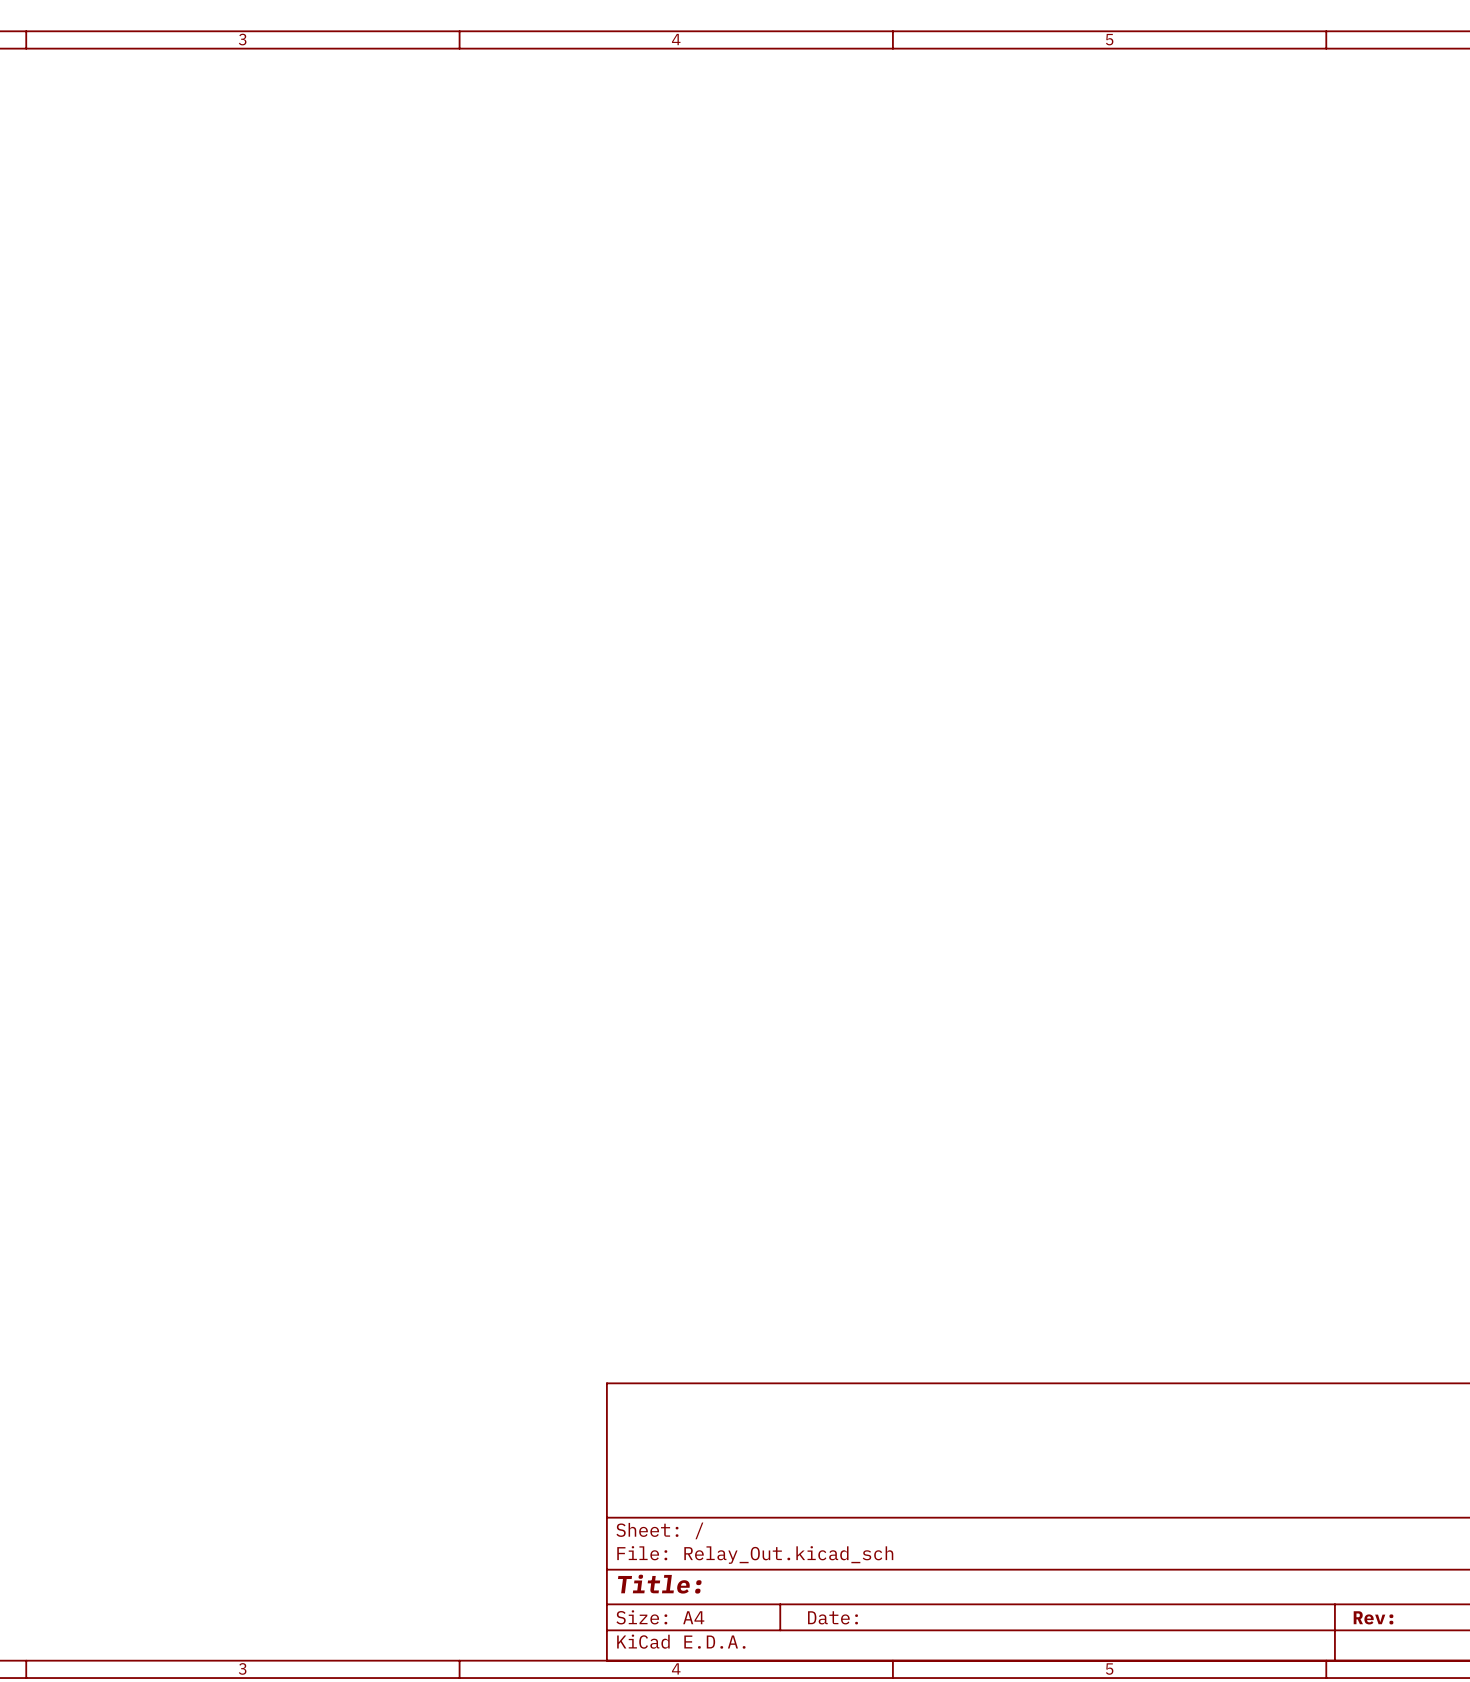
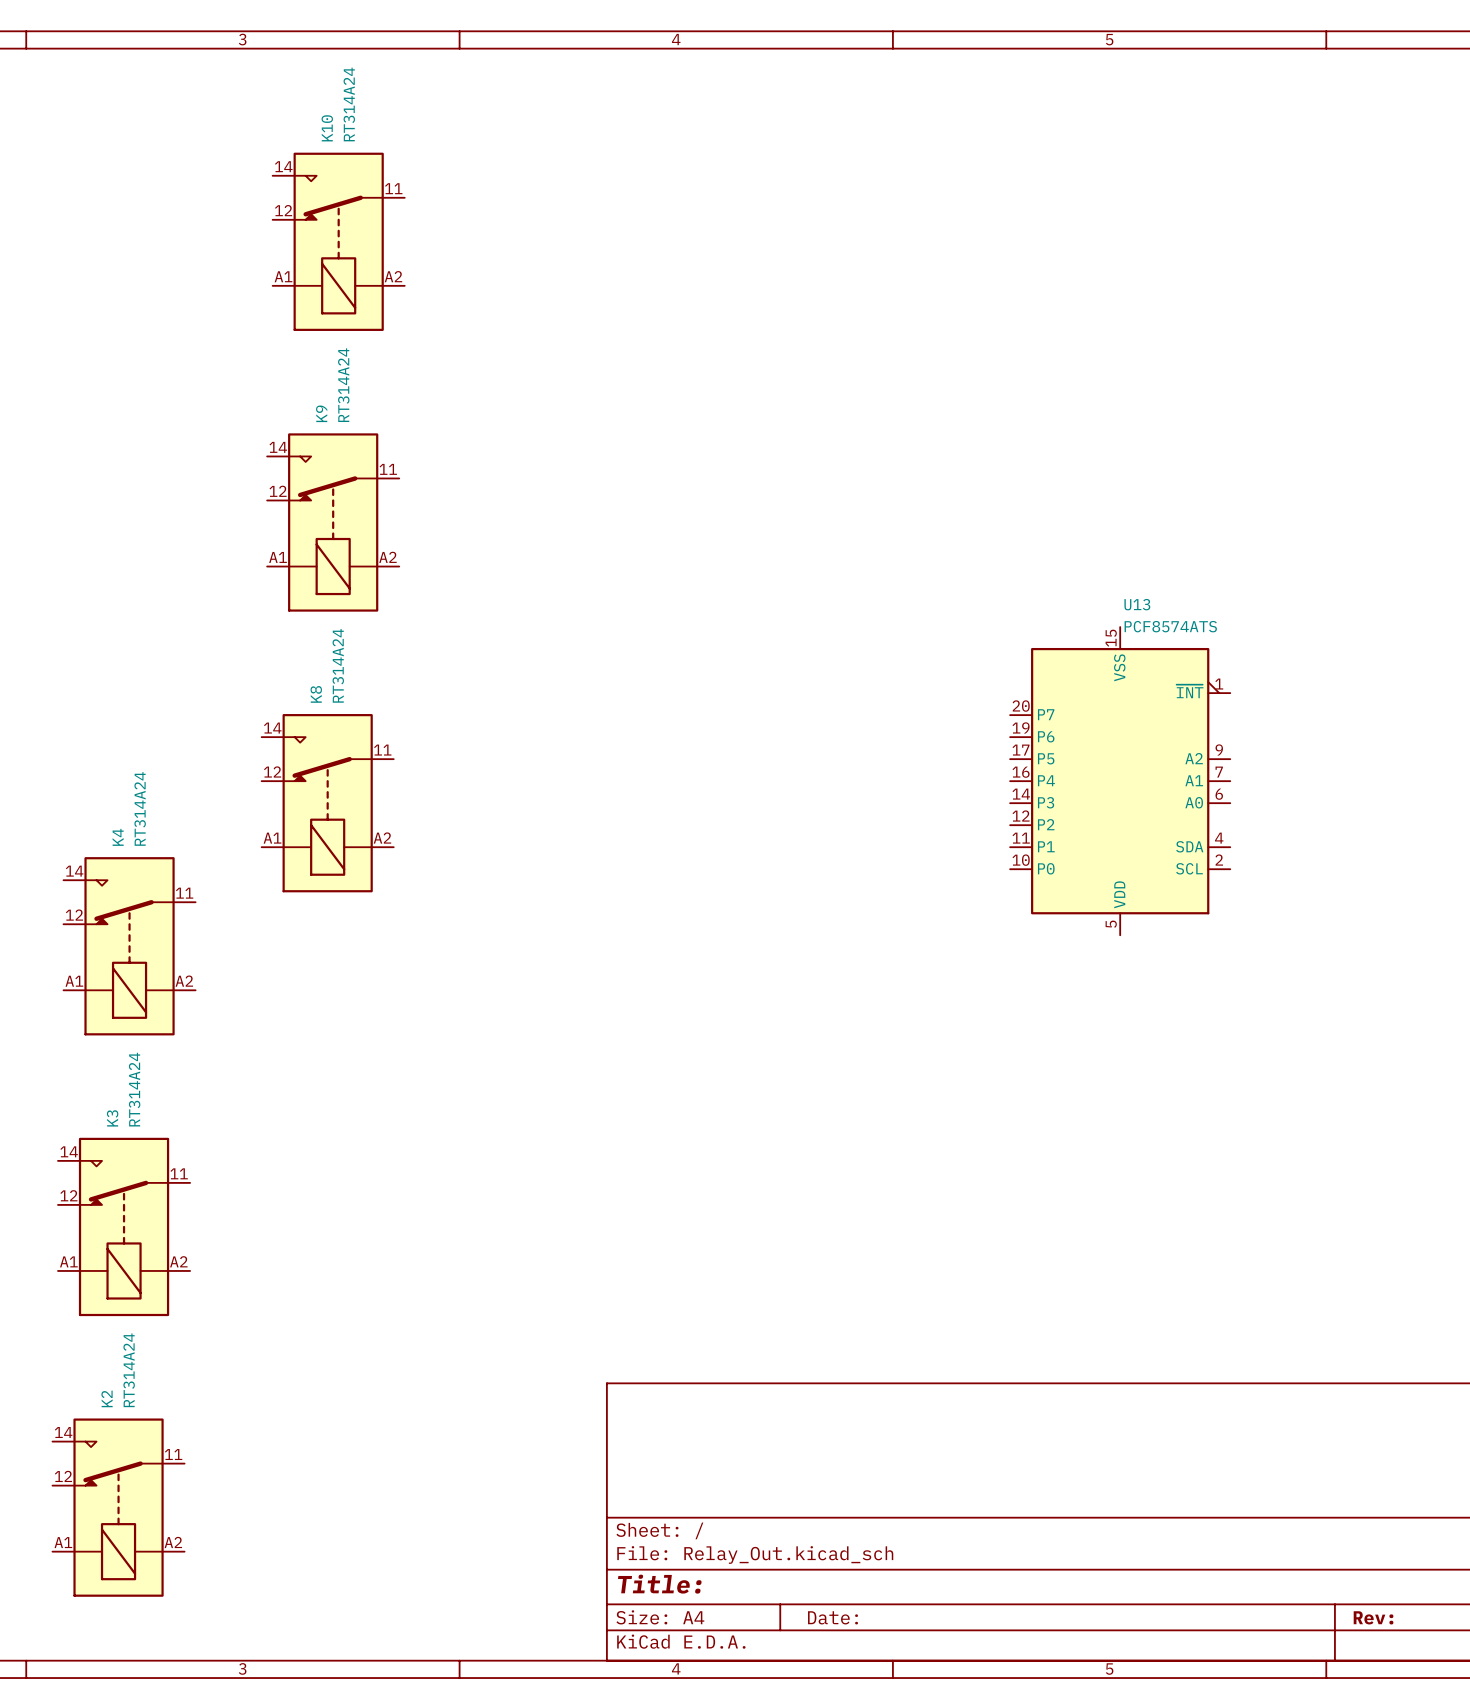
K10: none -> RT314A24 (338, 241)
K9: none -> RT314A24 (333, 522)
U13: none -> PCF8574ATS (1120, 781)
K8: none -> RT314A24 (327, 803)
K4: none -> RT314A24 (129, 946)
K3: none -> RT314A24 (124, 1226)
K2: none -> RT314A24 (118, 1507)

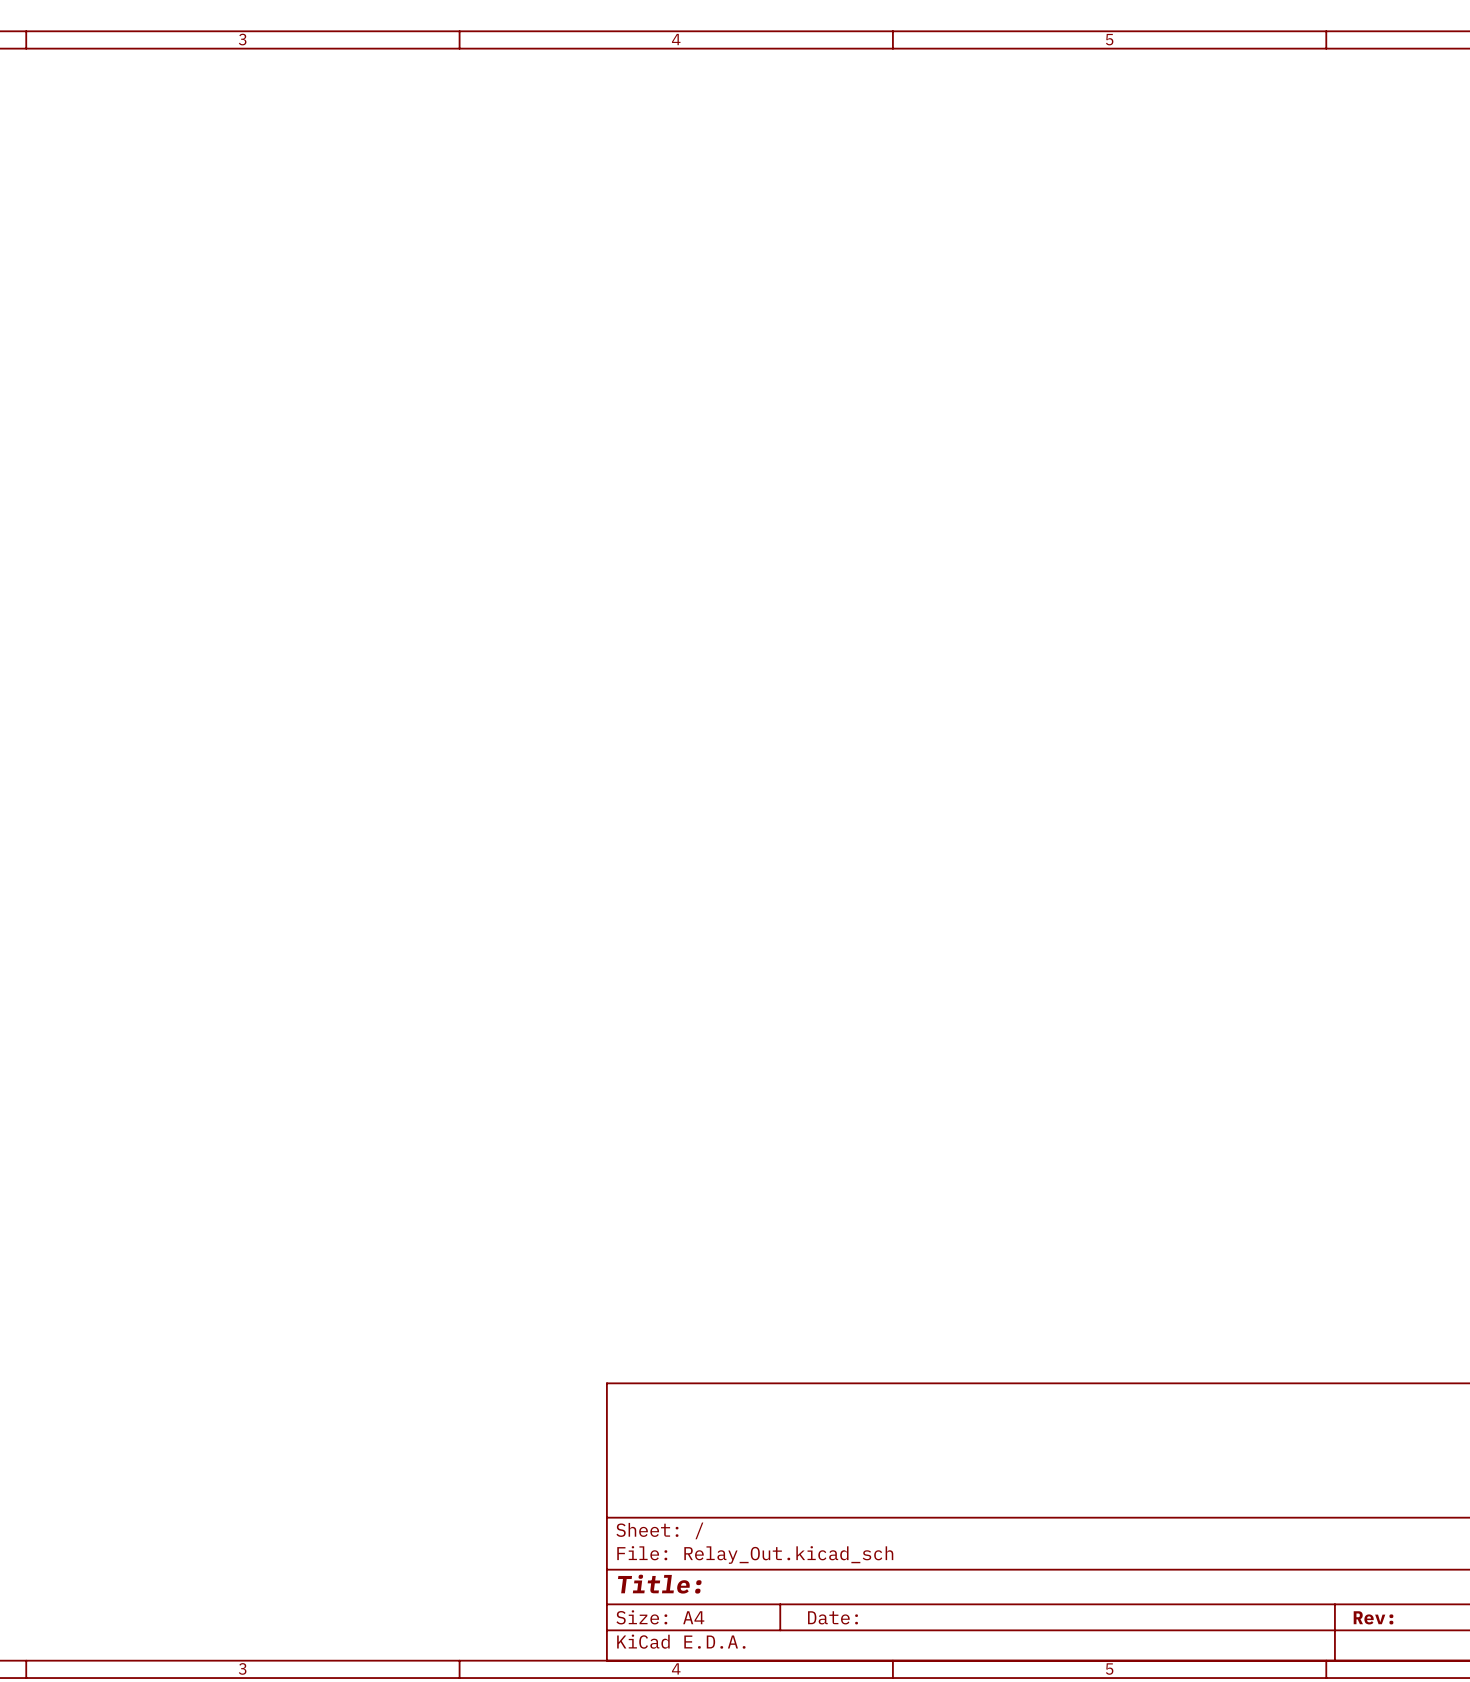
K10: RT314A24 (338, 241) -> none
K9: RT314A24 (333, 522) -> none
U13: PCF8574ATS (1120, 781) -> none
K8: RT314A24 (327, 803) -> none
K4: RT314A24 (129, 946) -> none
K3: RT314A24 (124, 1226) -> none
K2: RT314A24 (118, 1507) -> none

